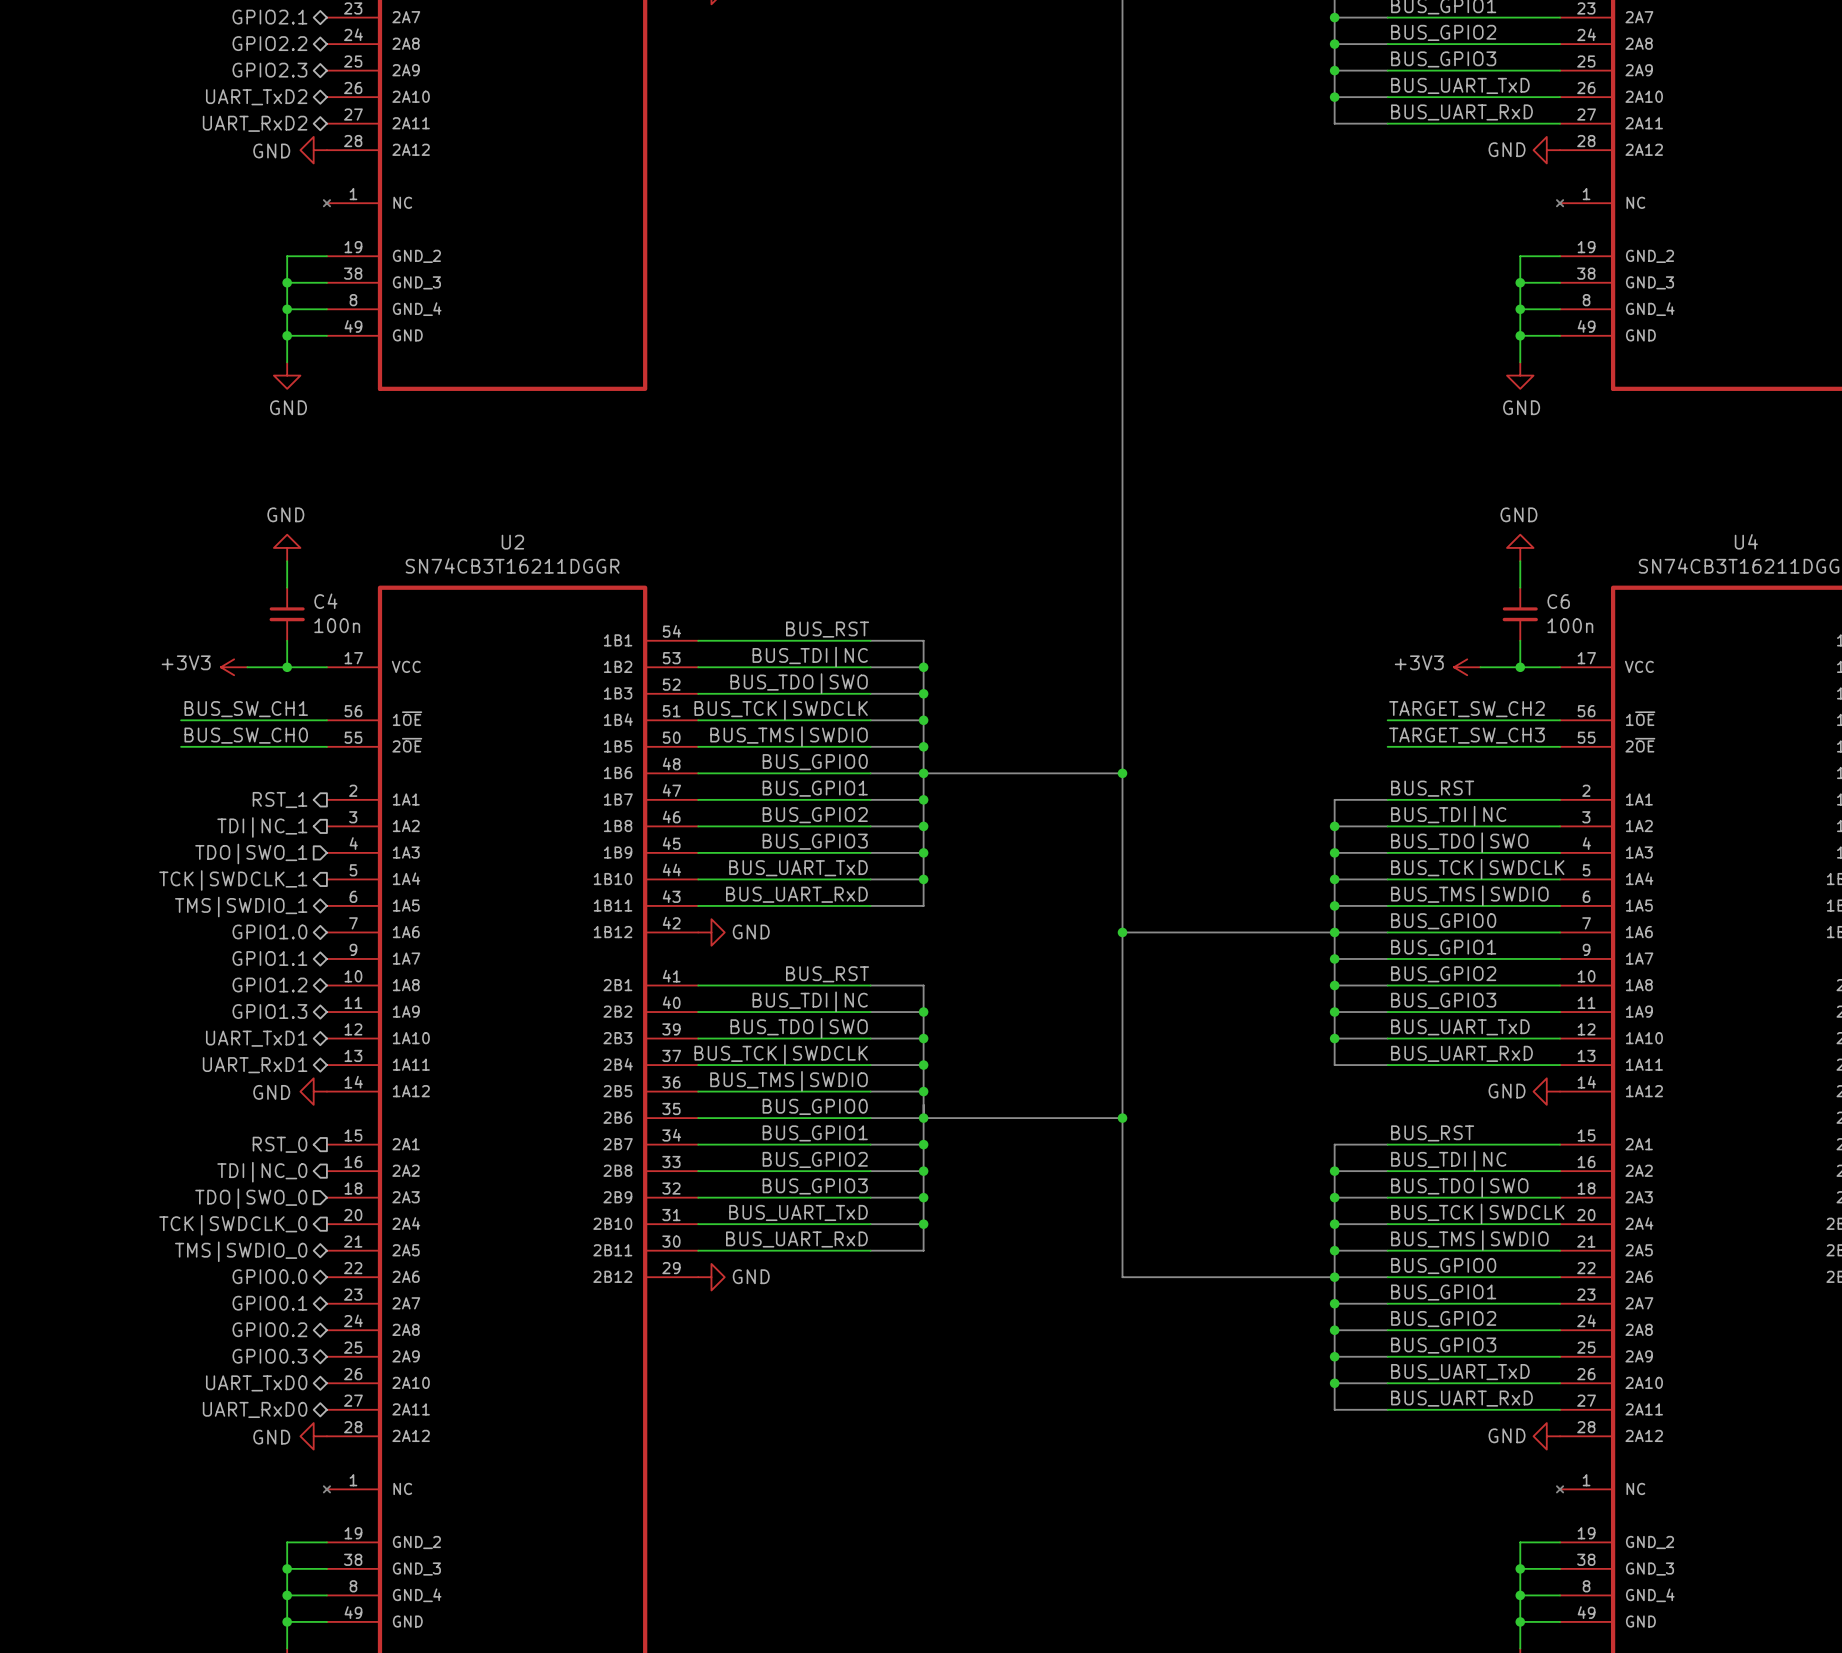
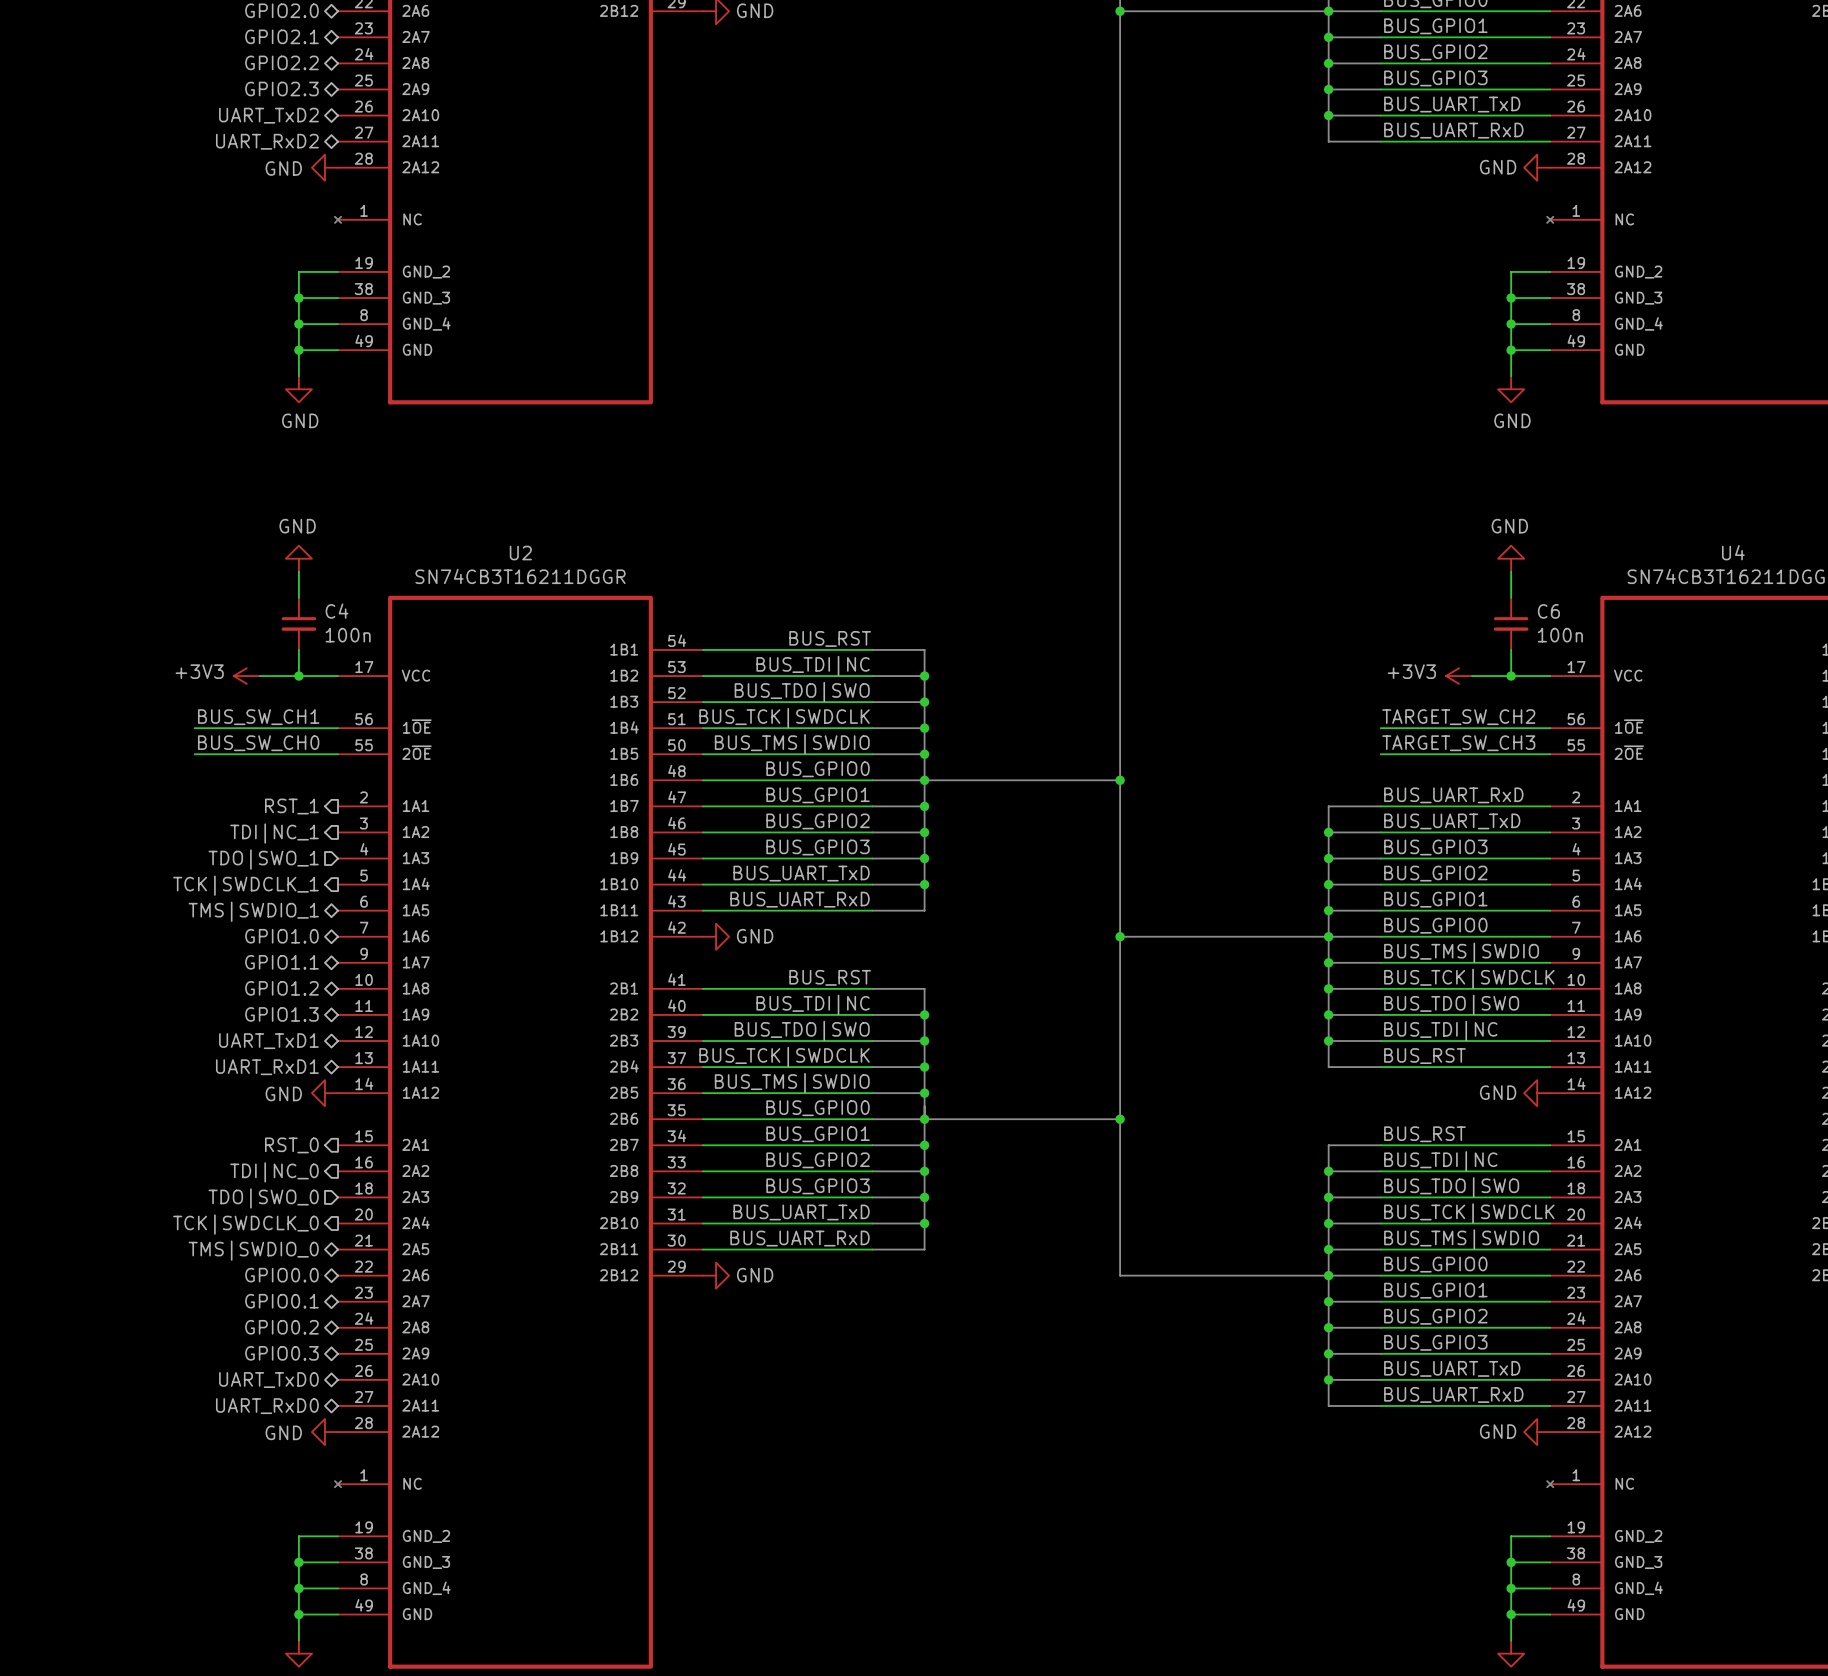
label: BUS_RST (1432, 788) -> BUS_UART_RxD (1453, 795)
label: BUS_TDI|NC (1448, 816) -> BUS_UART_TxD (1452, 821)
label: BUS_TDO|SWO (1459, 842) -> BUS_GPIO3 (1435, 847)
label: BUS_TCK|SWDCLK (1477, 869) -> BUS_GPIO2 (1435, 873)
label: BUS_TMS|SWDIO (1469, 895) -> BUS_GPIO1 (1435, 899)
label: BUS_GPIO1 (1443, 947) -> BUS_TMS|SWDIO (1461, 952)
label: BUS_GPIO2 (1443, 974) -> BUS_TCK|SWDCLK (1469, 978)
label: BUS_GPIO3 (1443, 1000) -> BUS_TDO|SWO (1451, 1004)
label: BUS_UART_TxD (1460, 1027) -> BUS_TDI|NC (1440, 1030)
label: BUS_UART_RxD (1461, 1053) -> BUS_RST (1424, 1056)

